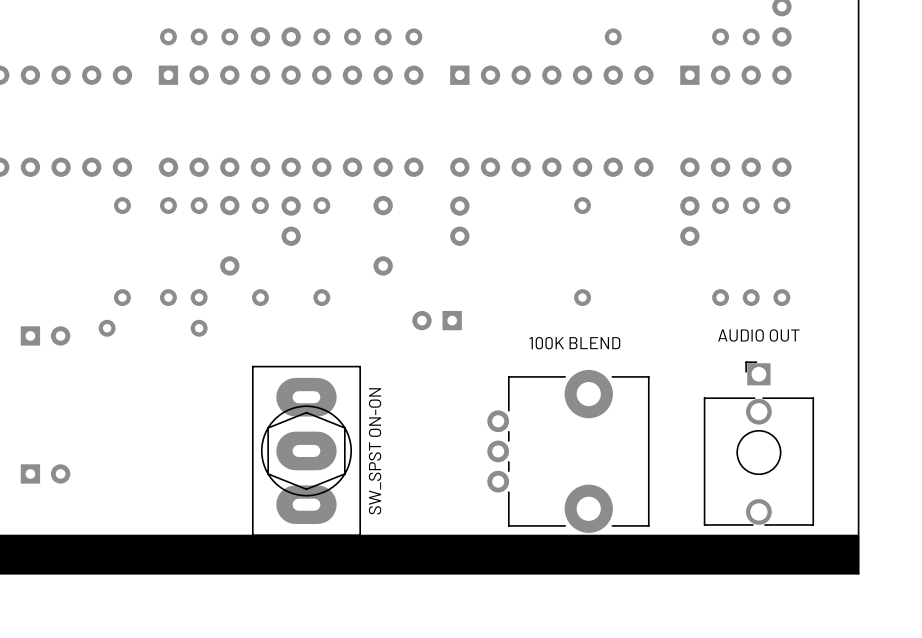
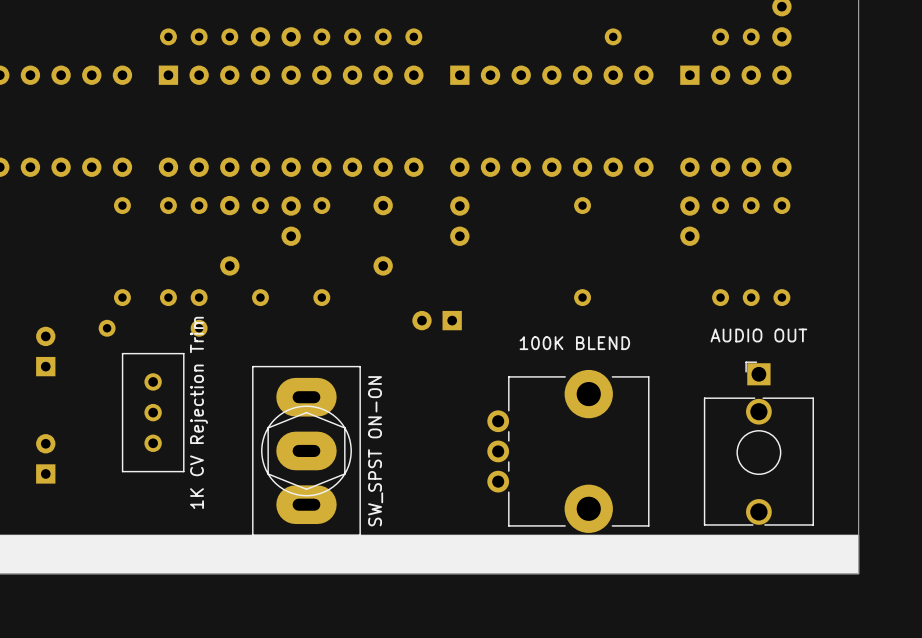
part rotation: 0° (45, 335) -> 90° counterclockwise (45, 351)
part: none -> 1K CV Rejection Trim (153, 412)
part rotation: 0° (45, 473) -> 90° counterclockwise (45, 458)

